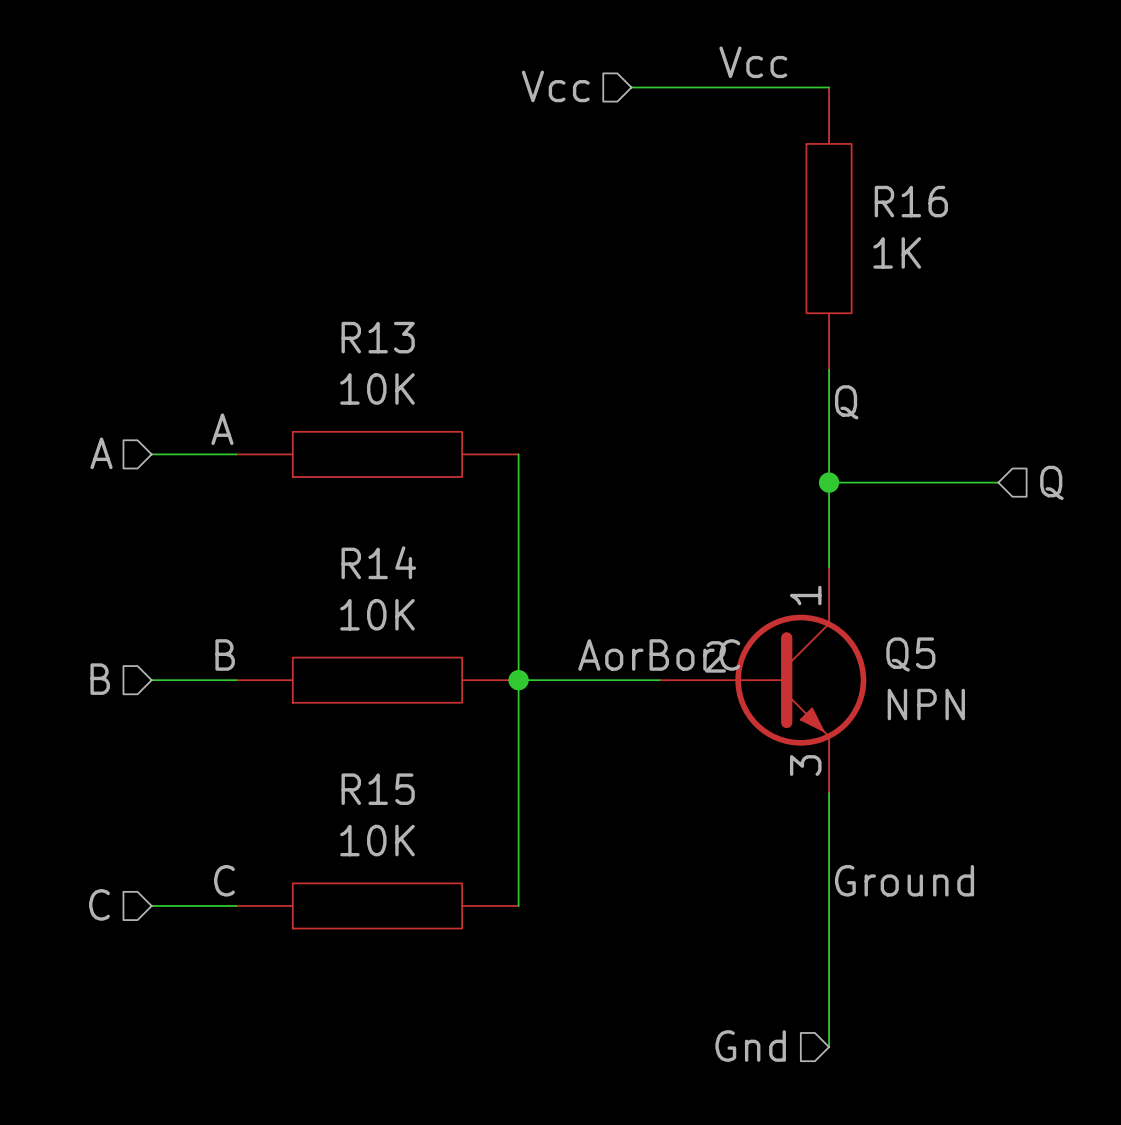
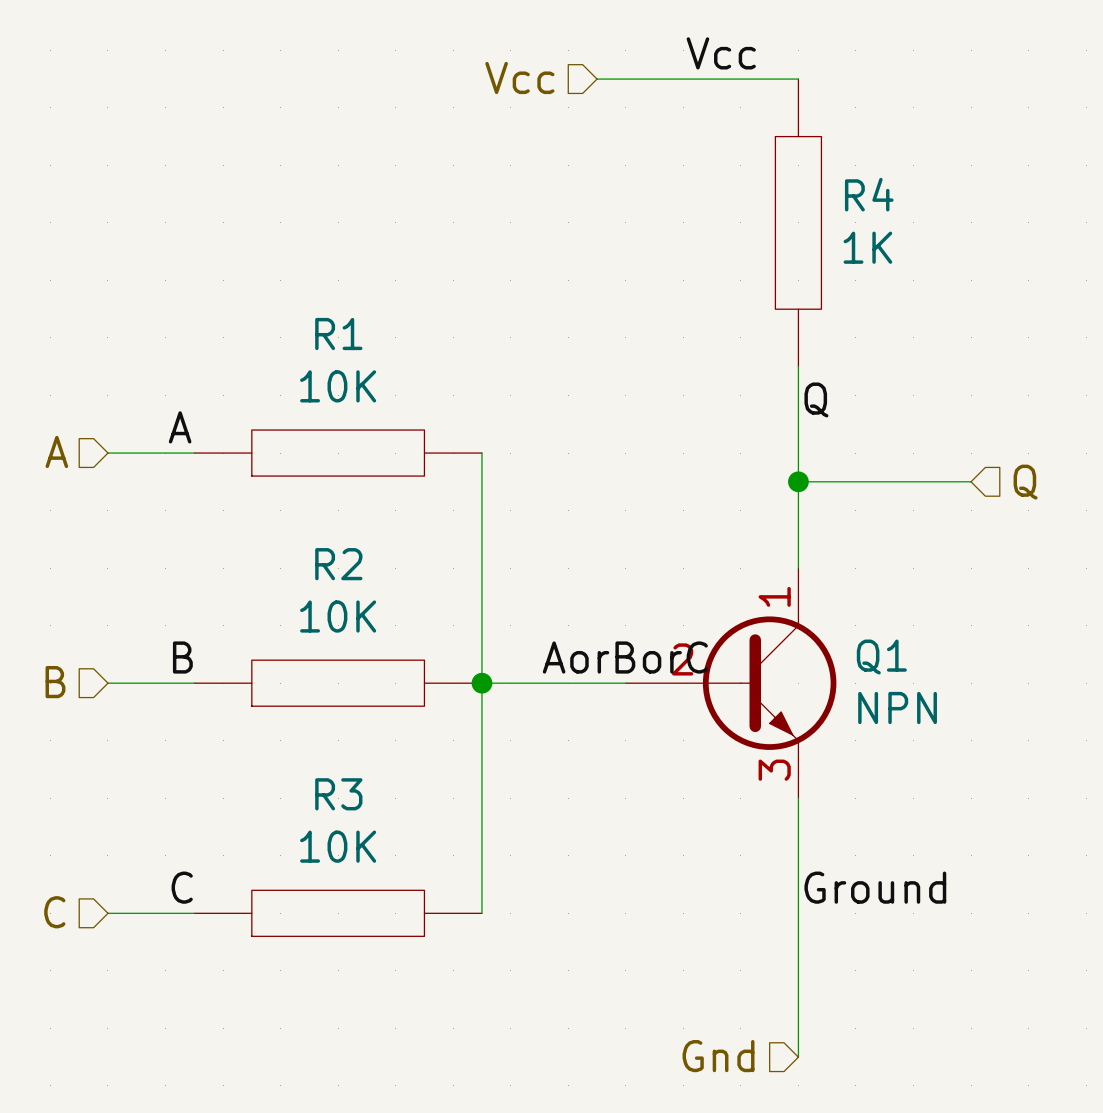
R16 name: R16 (911, 201) -> R4 (869, 194)
R13 name: R13 (378, 337) -> R1 (338, 334)
R14 name: R14 (378, 562) -> R2 (338, 564)
Q5 name: Q5 (910, 654) -> Q1 (881, 657)
R15 name: R15 (378, 789) -> R3 (338, 794)

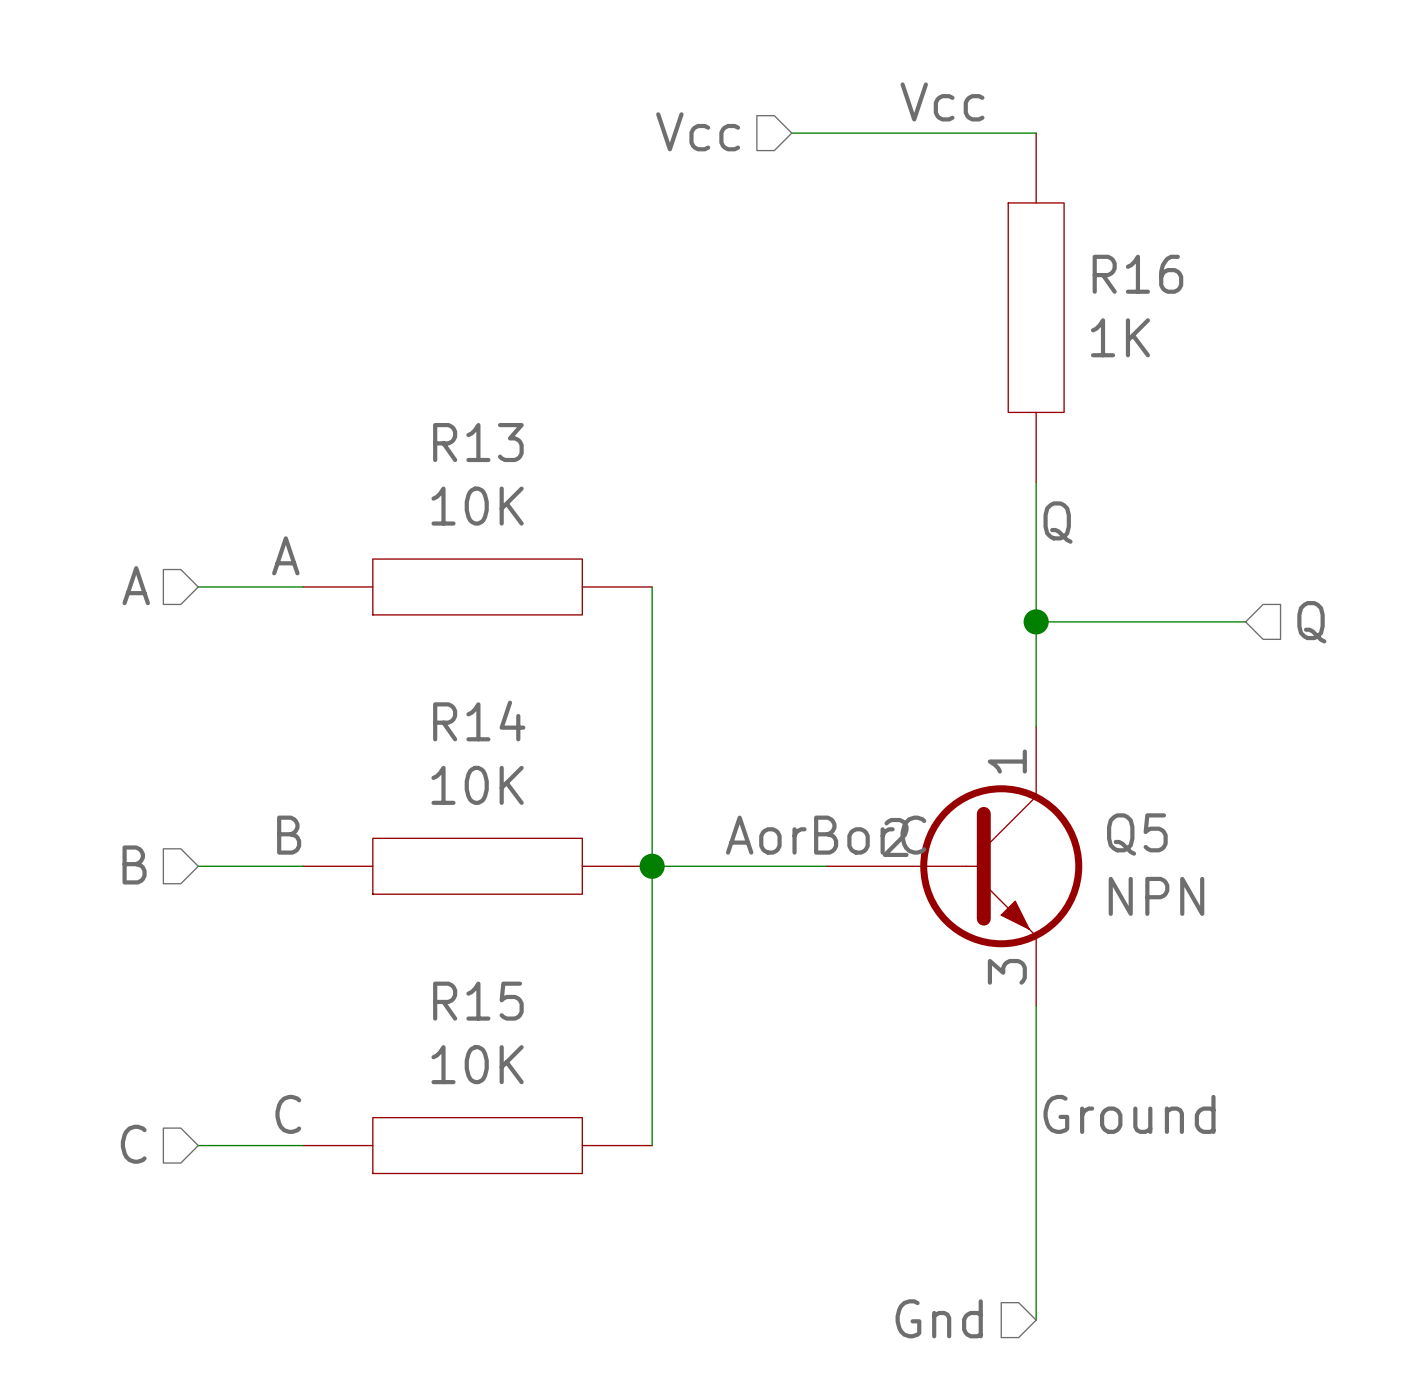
R4 name: R4 (869, 194) -> R16 (1137, 274)
R1 name: R1 (338, 334) -> R13 (478, 442)
R2 name: R2 (338, 564) -> R14 (479, 721)
Q1 name: Q1 (881, 657) -> Q5 (1137, 834)
R3 name: R3 (338, 794) -> R15 (478, 1001)

